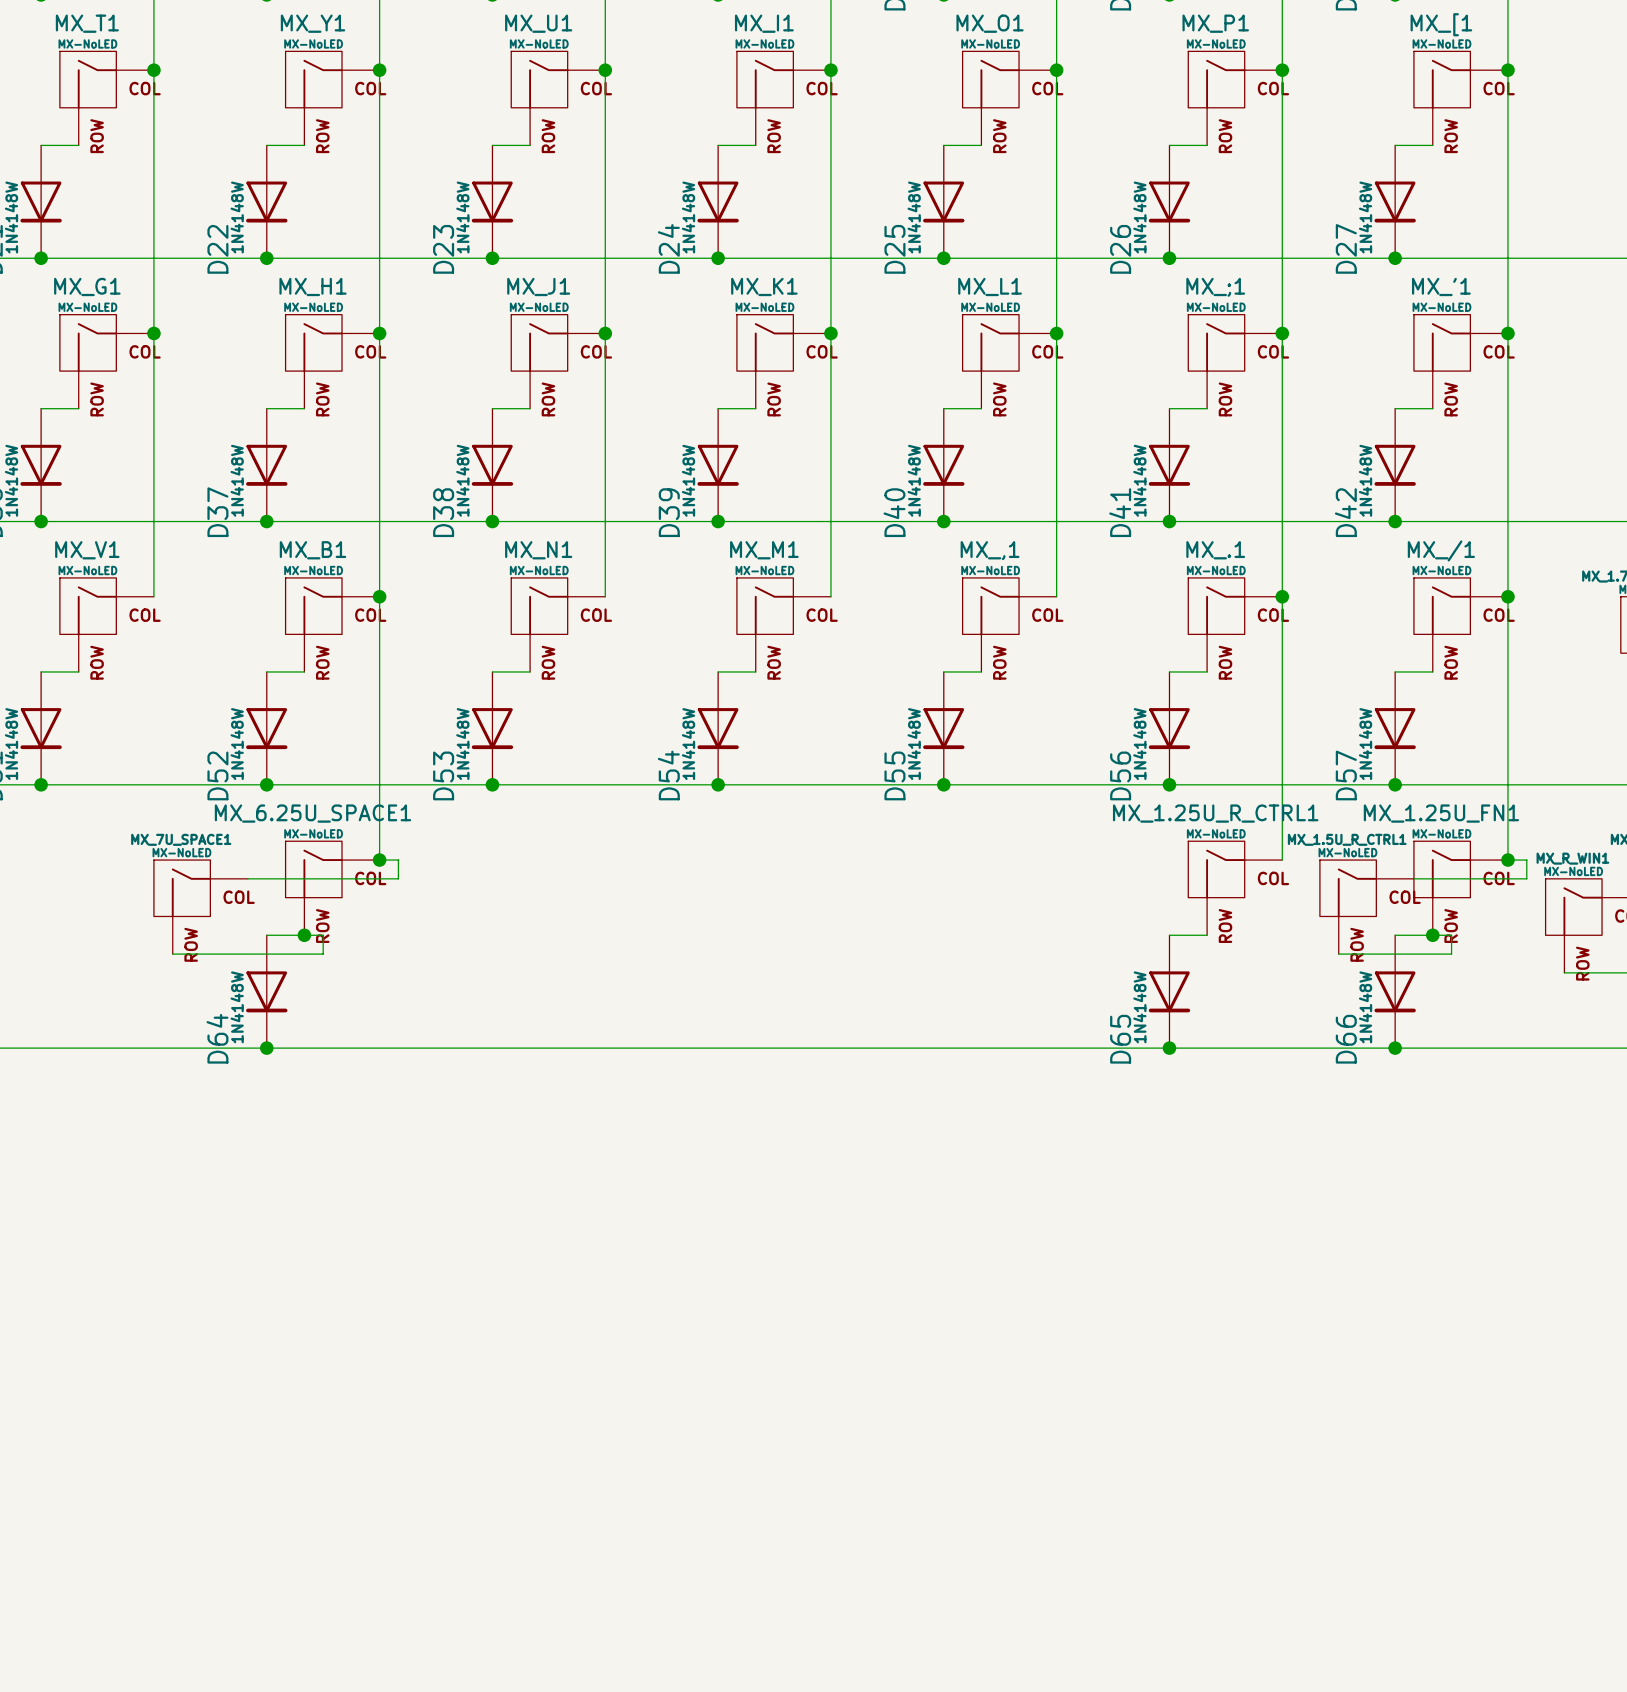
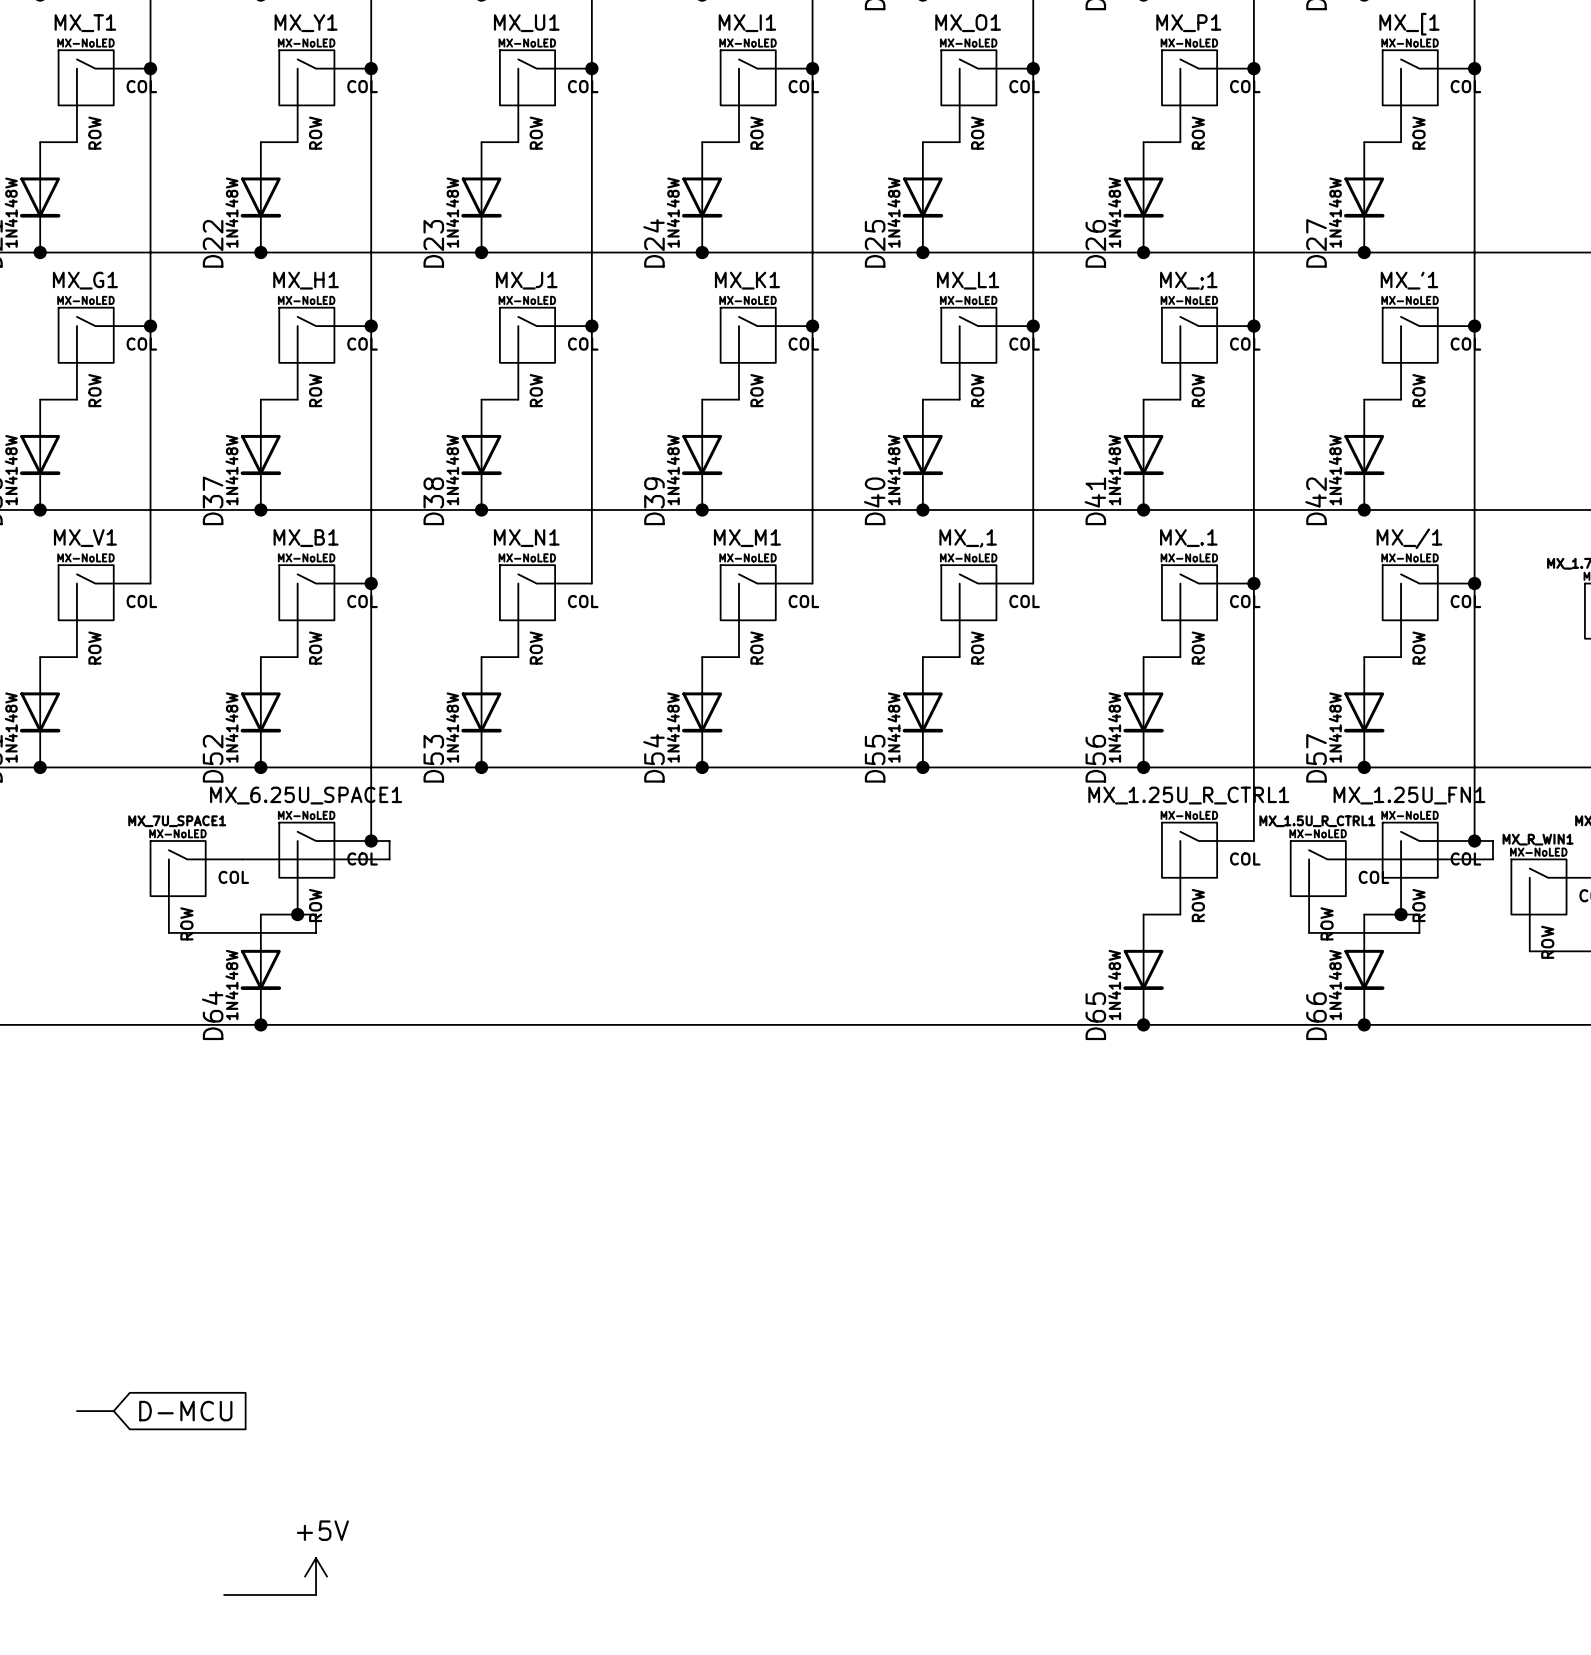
wire: none -> (76, 1411) (113, 1411)
global label: none -> D-MCU (185, 1411)
power symbol: none -> +5V (316, 1576)
wire: none -> (224, 1594) (316, 1594)

